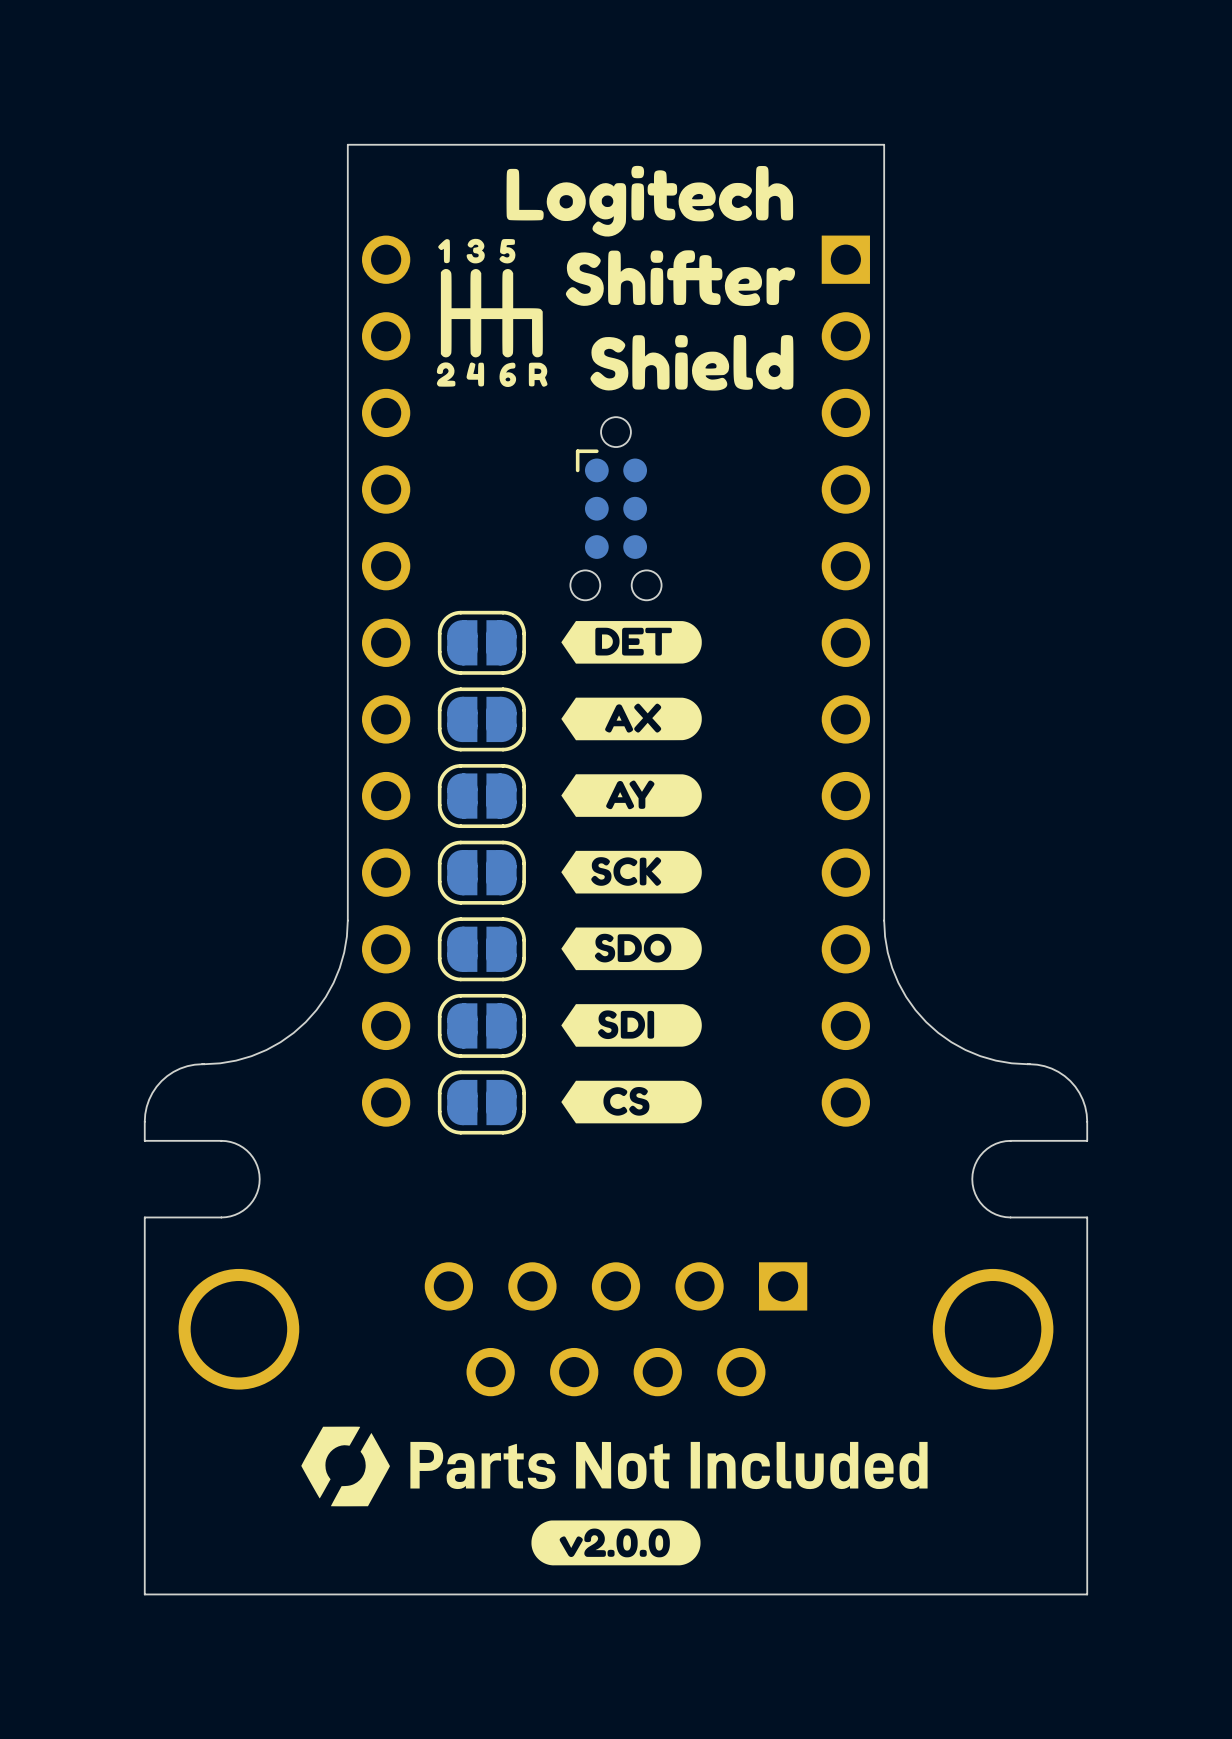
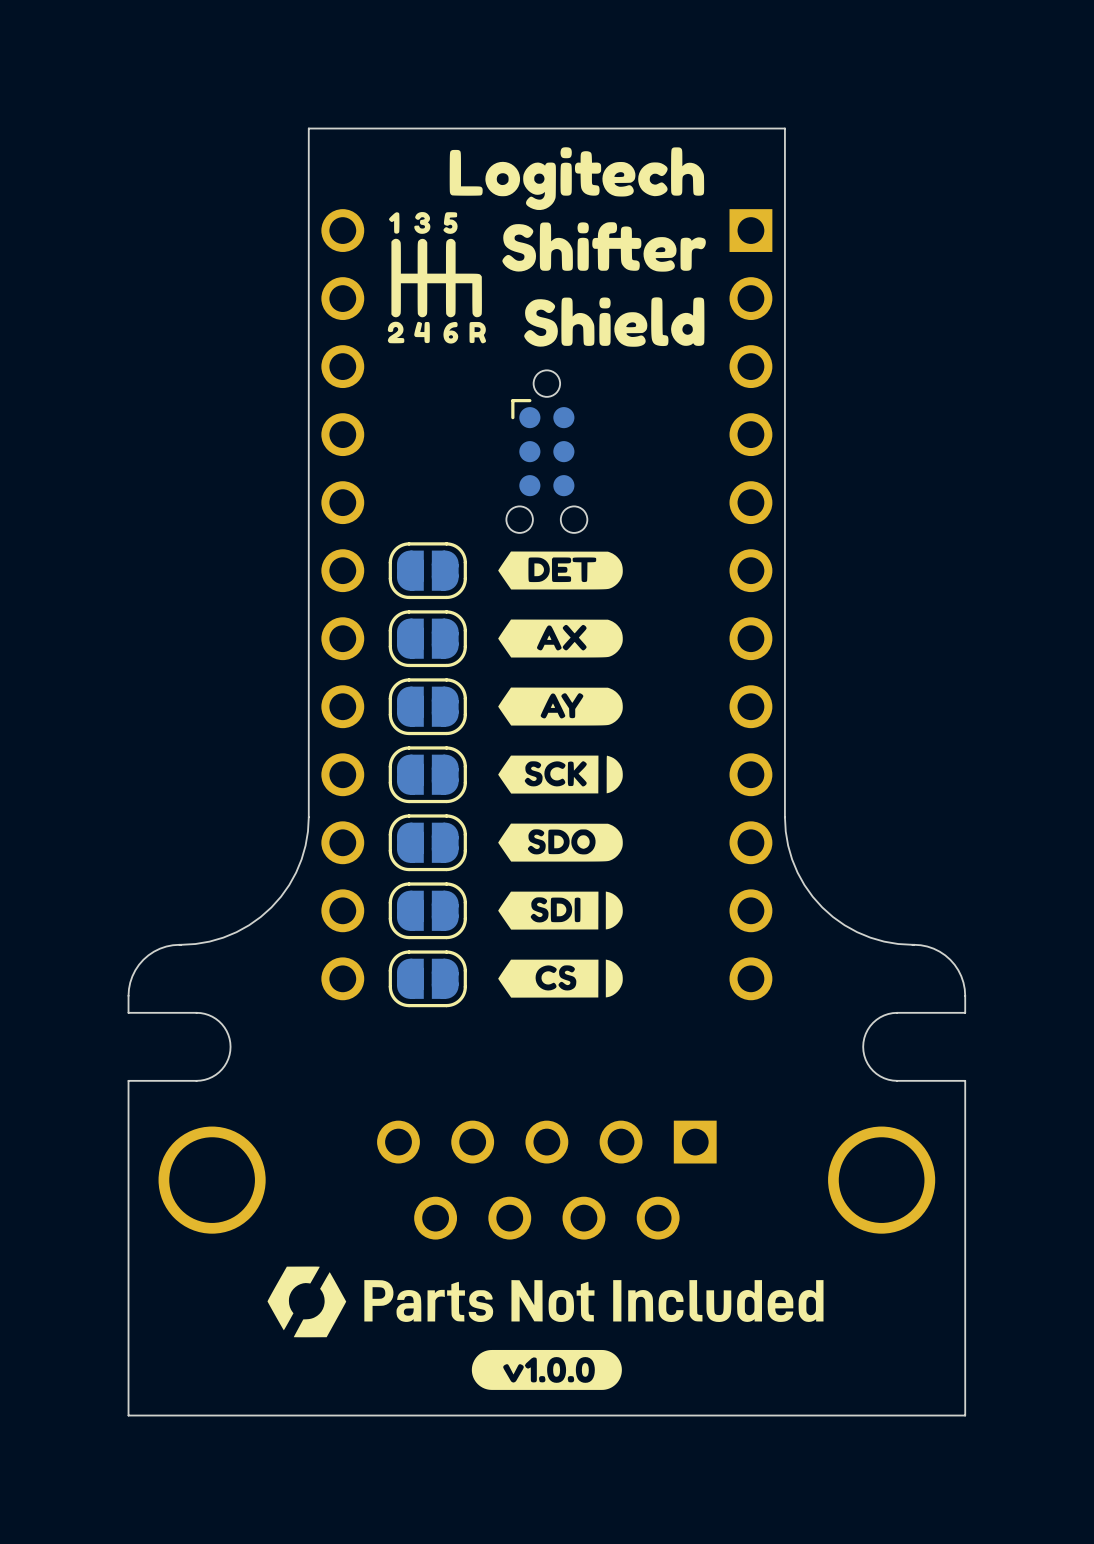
drawing shape: [561, 621, 702, 1124] -> [498, 551, 623, 998]
drawing shape: [531, 1520, 701, 1566] -> [471, 1349, 622, 1390]

